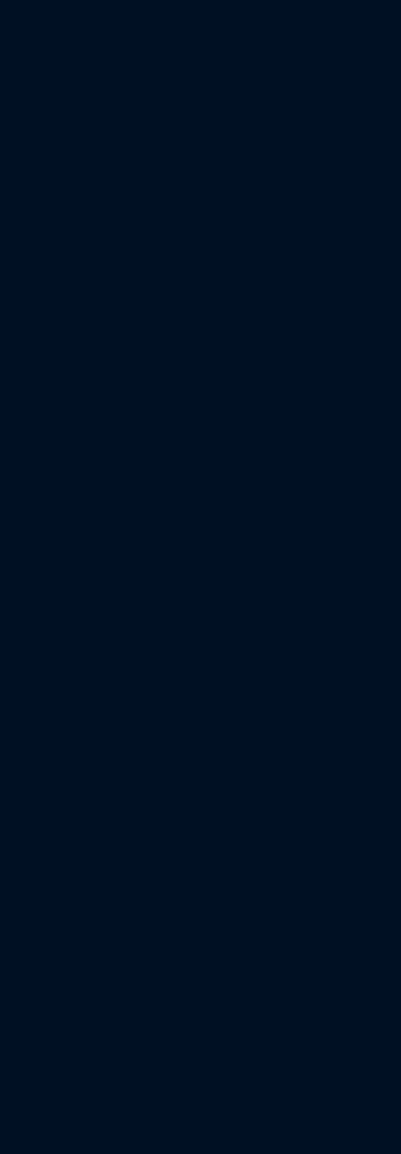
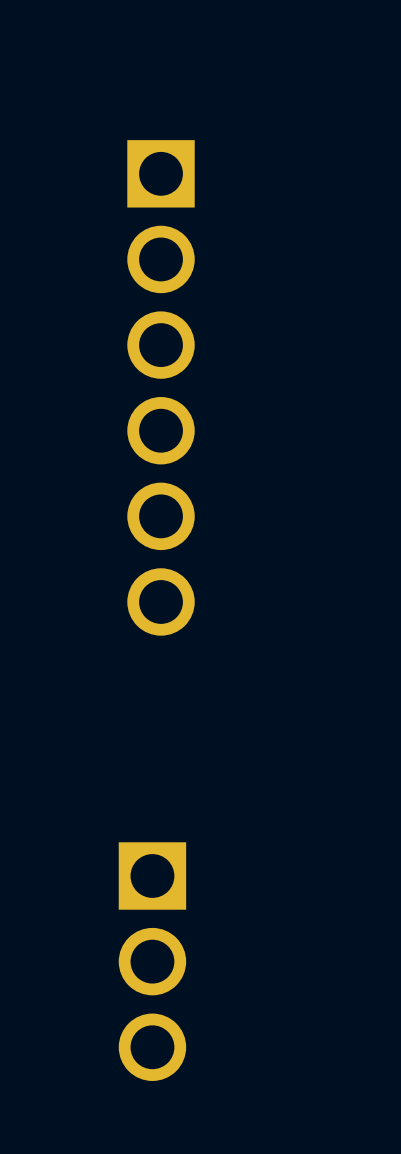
part: none -> (161, 387)
part: none -> (152, 961)

